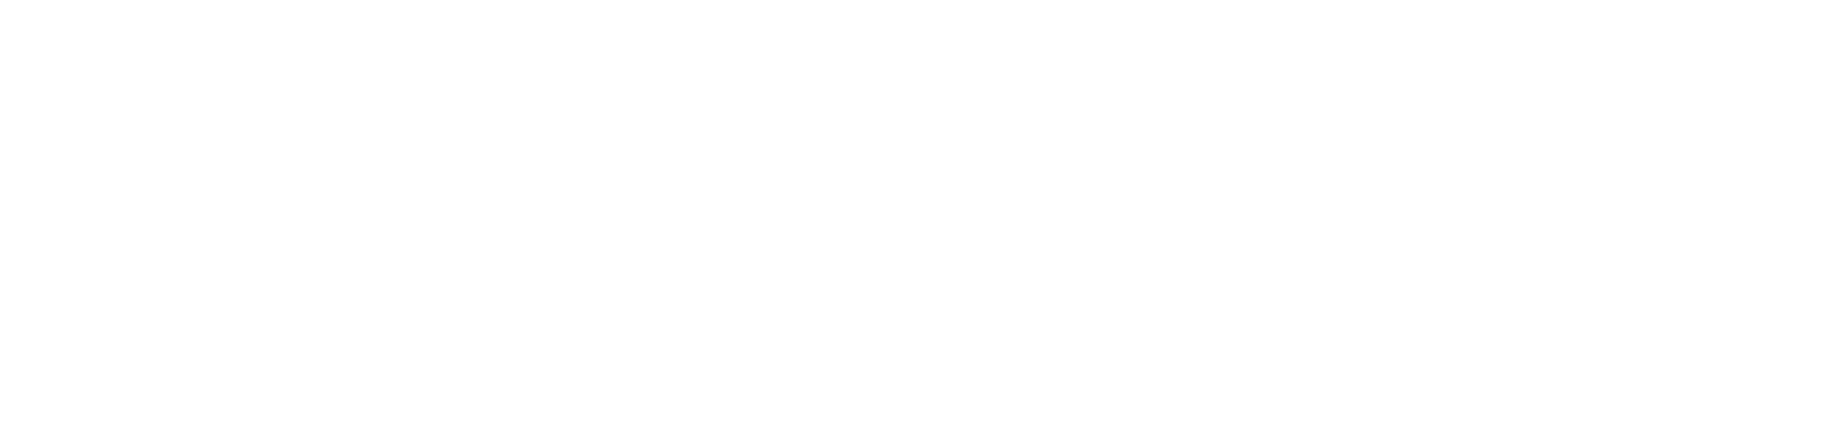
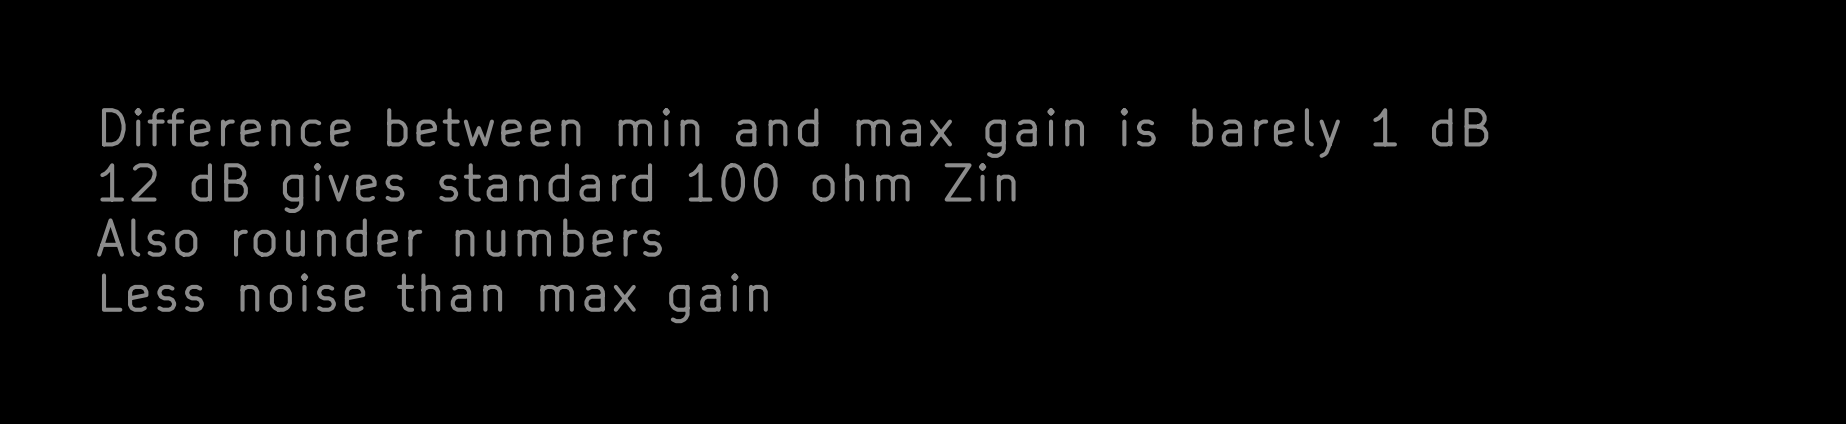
text: none -> Difference between min and max gain is barely 1 dB (795, 133)
text: none -> 12 dB gives standard 100 ohm Zin (557, 188)
text: none -> Also rounder numbers (379, 237)
text: none -> Less noise than max gain (434, 298)

